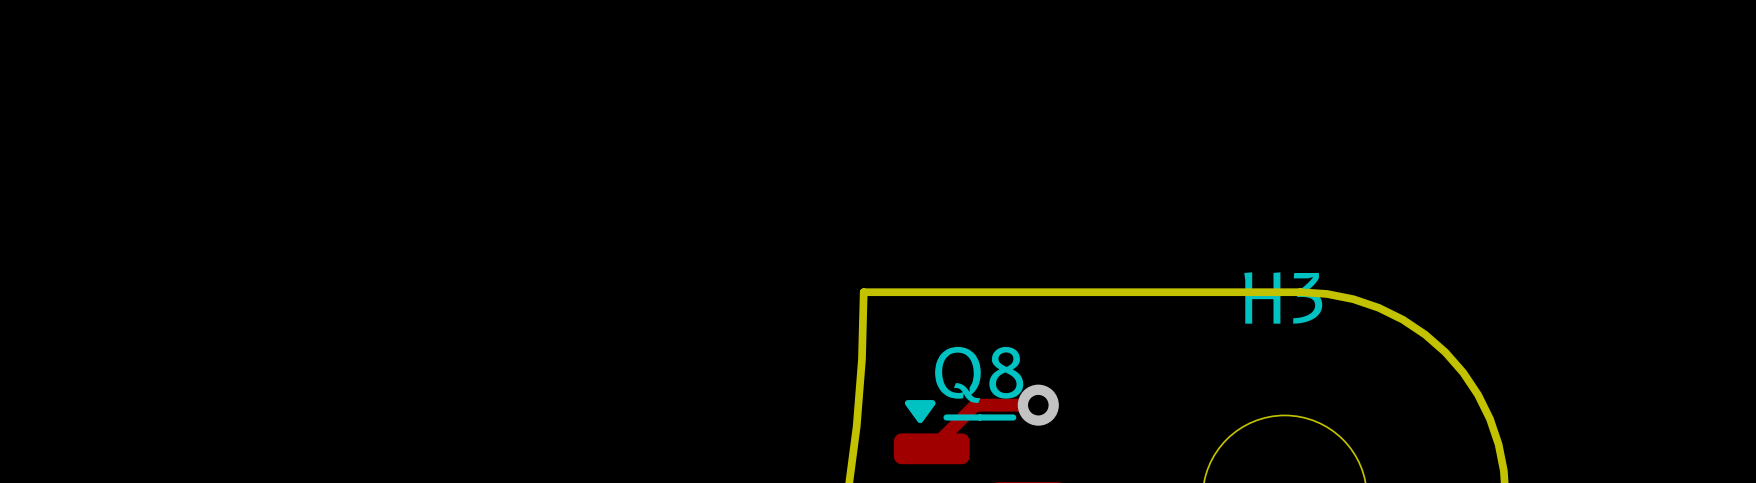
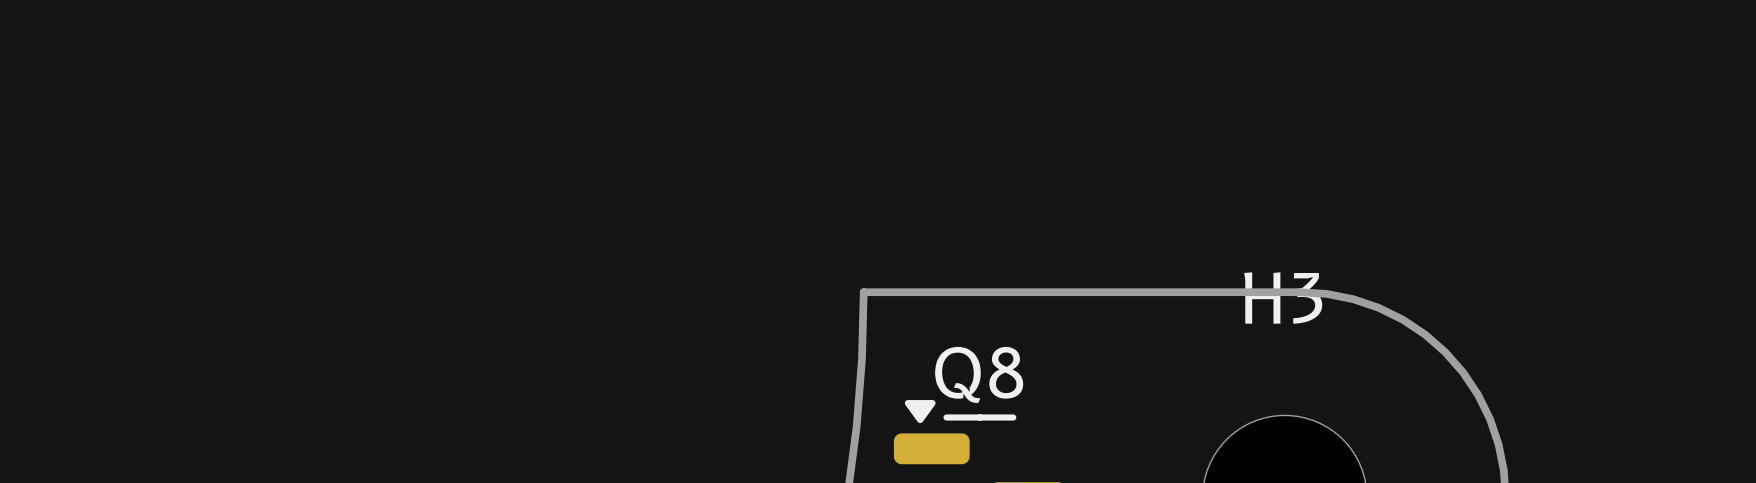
track: (1038, 405) (975, 405) (931, 448) -> none
via: (1038, 405) -> none

